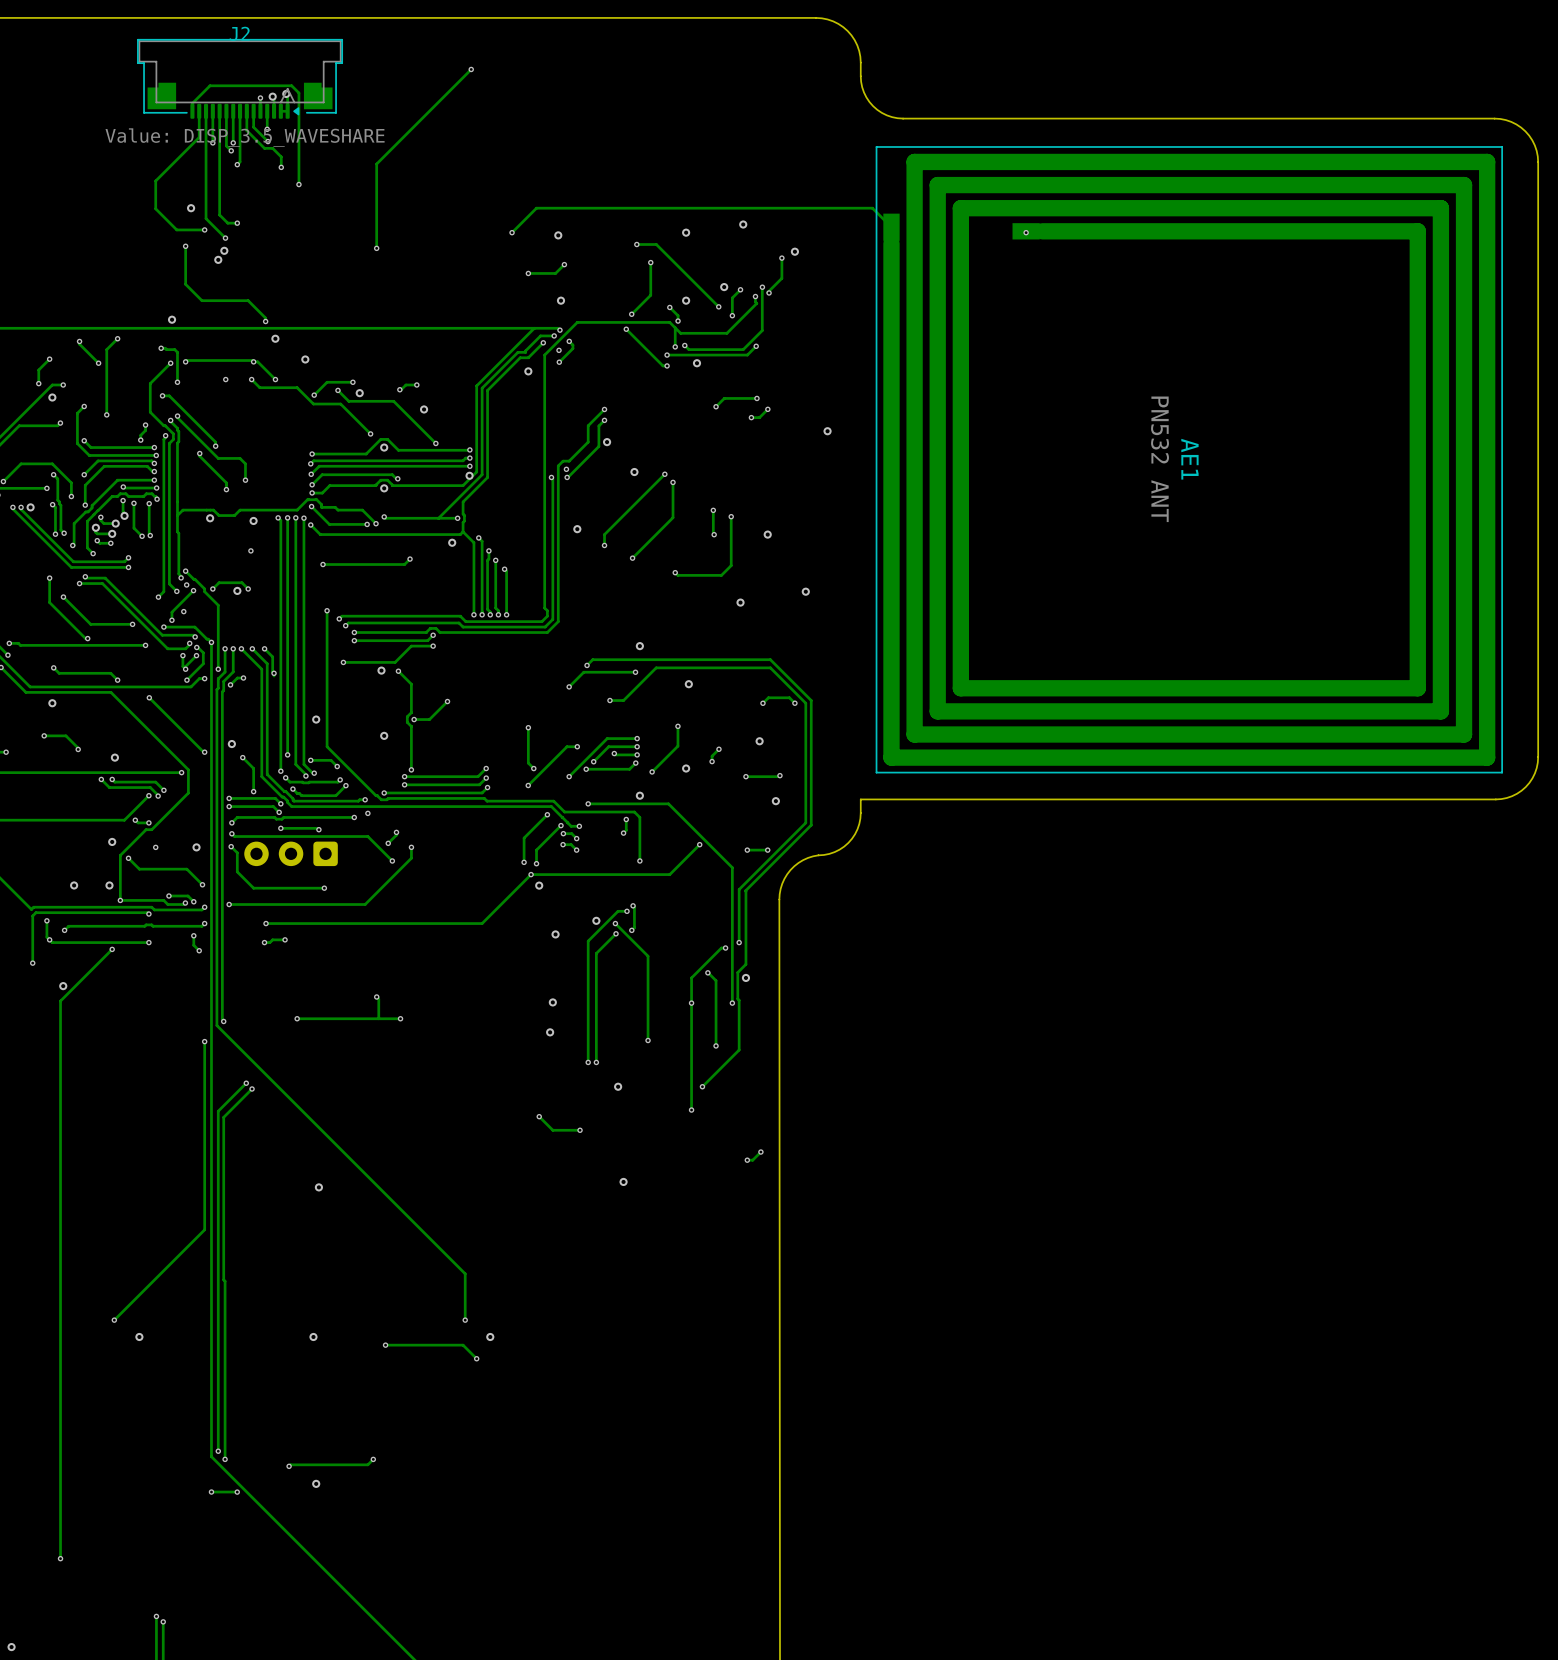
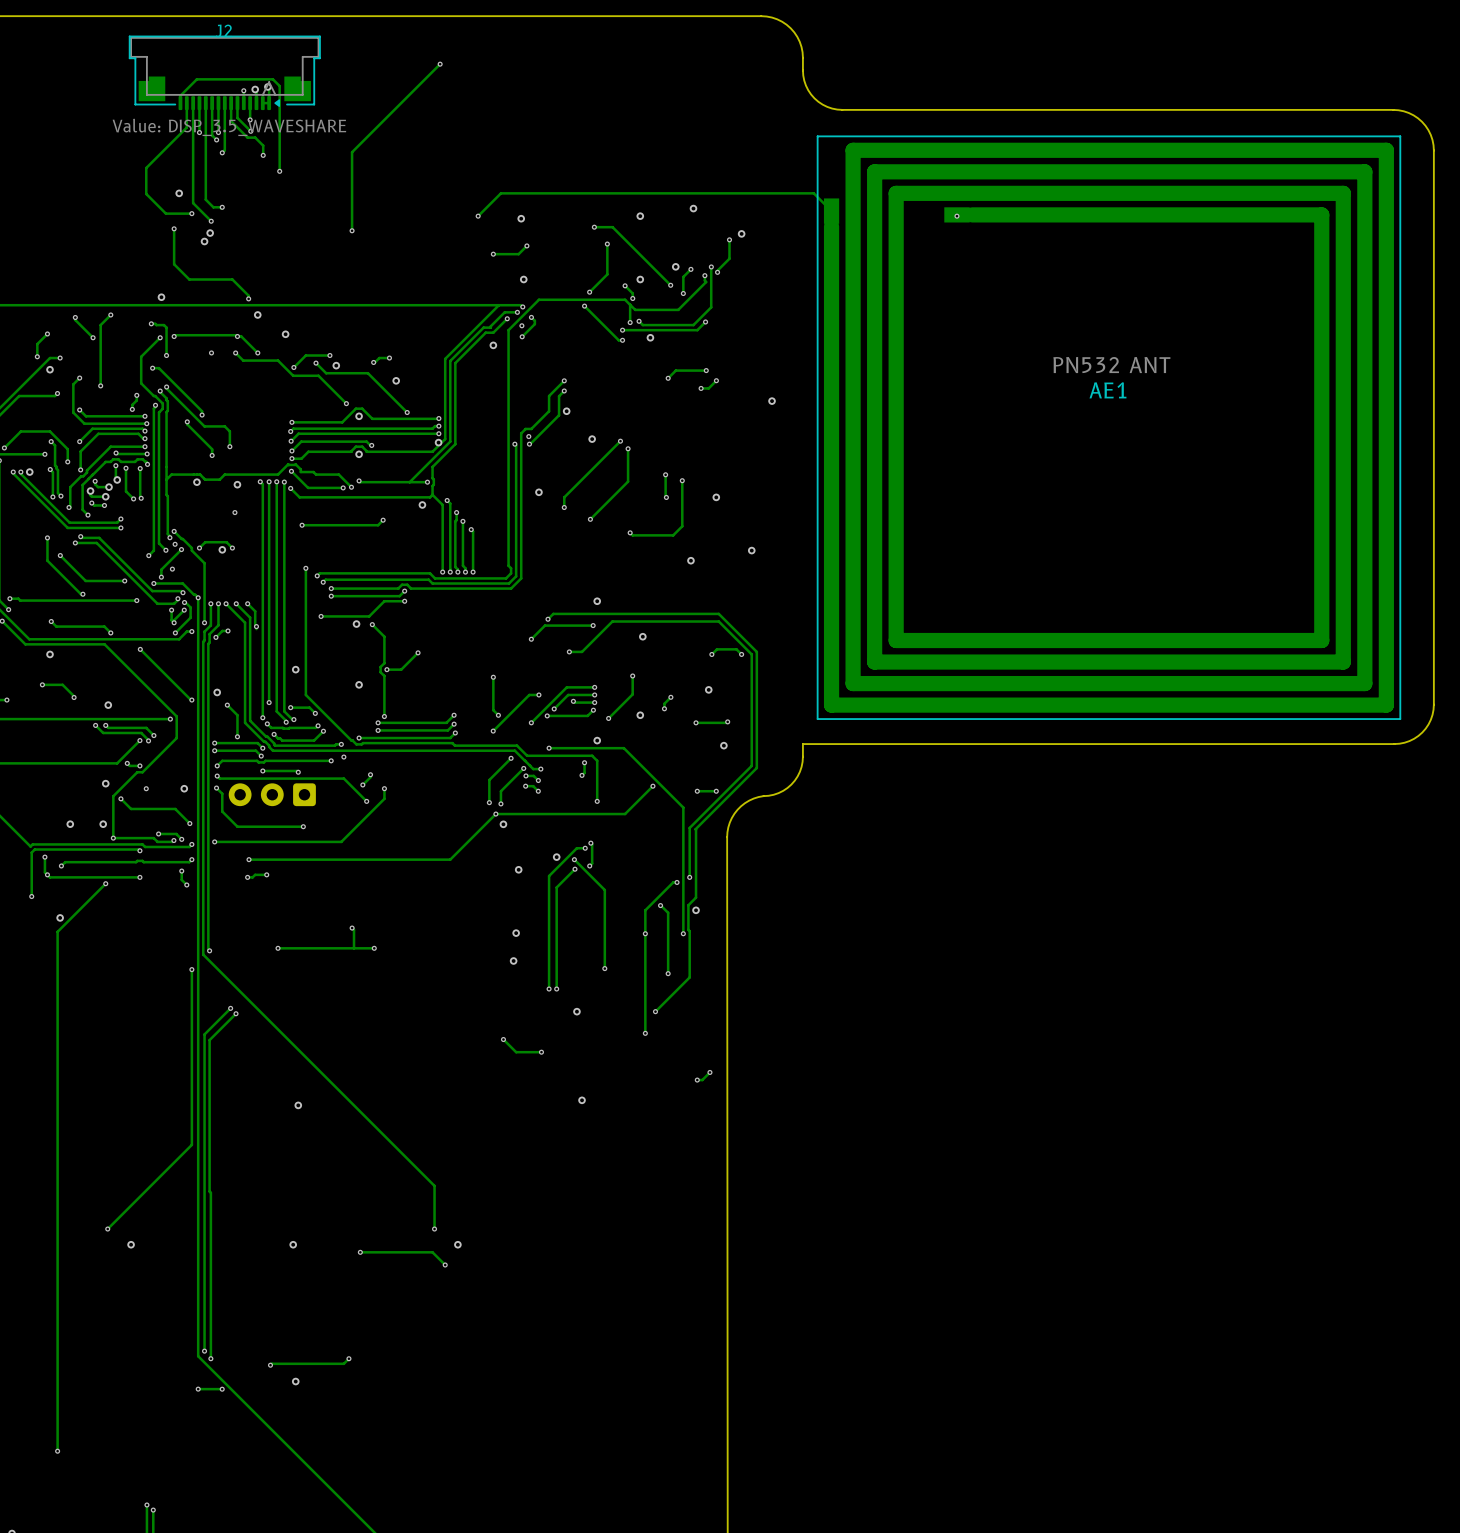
AE1 value rotation: 0° (1160, 459) -> 90° counterclockwise (1111, 365)
AE1 name rotation: 0° (1189, 459) -> 90° counterclockwise (1107, 390)

